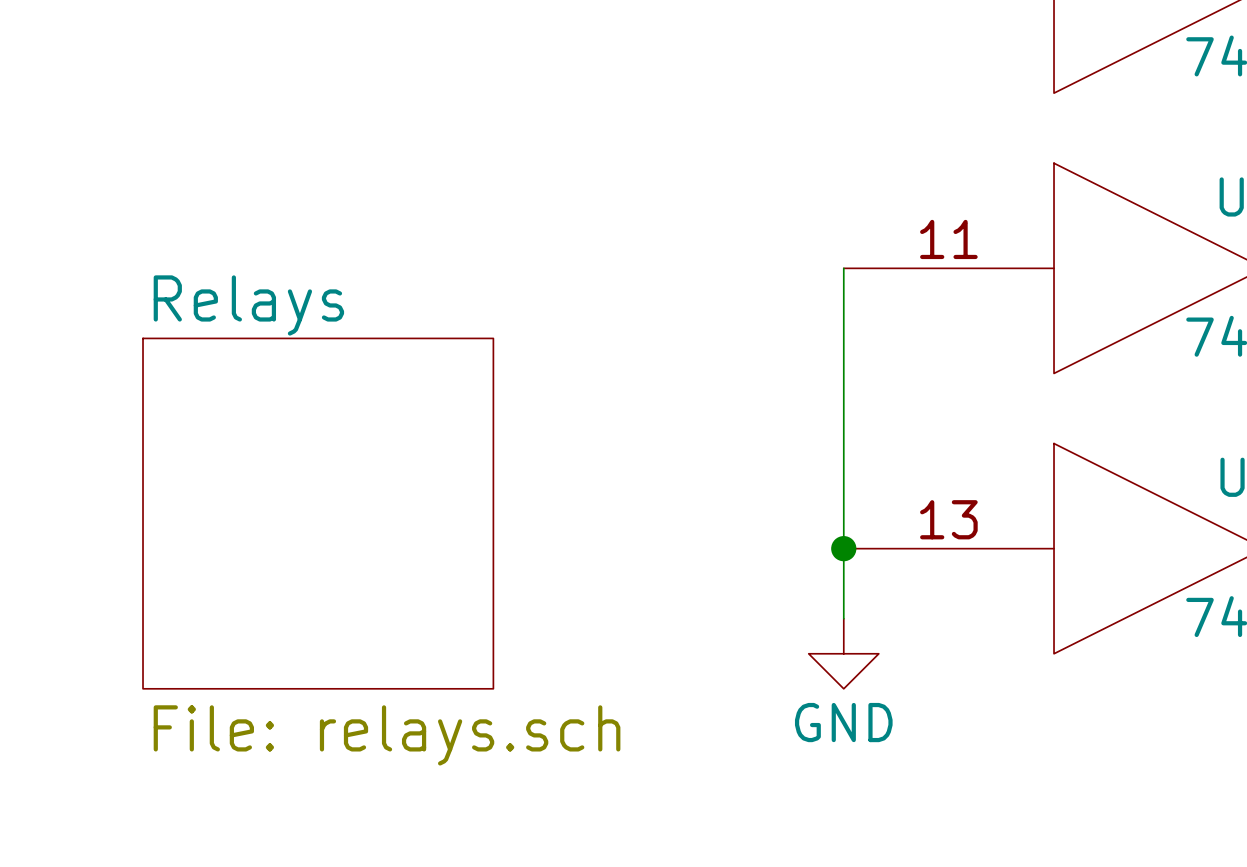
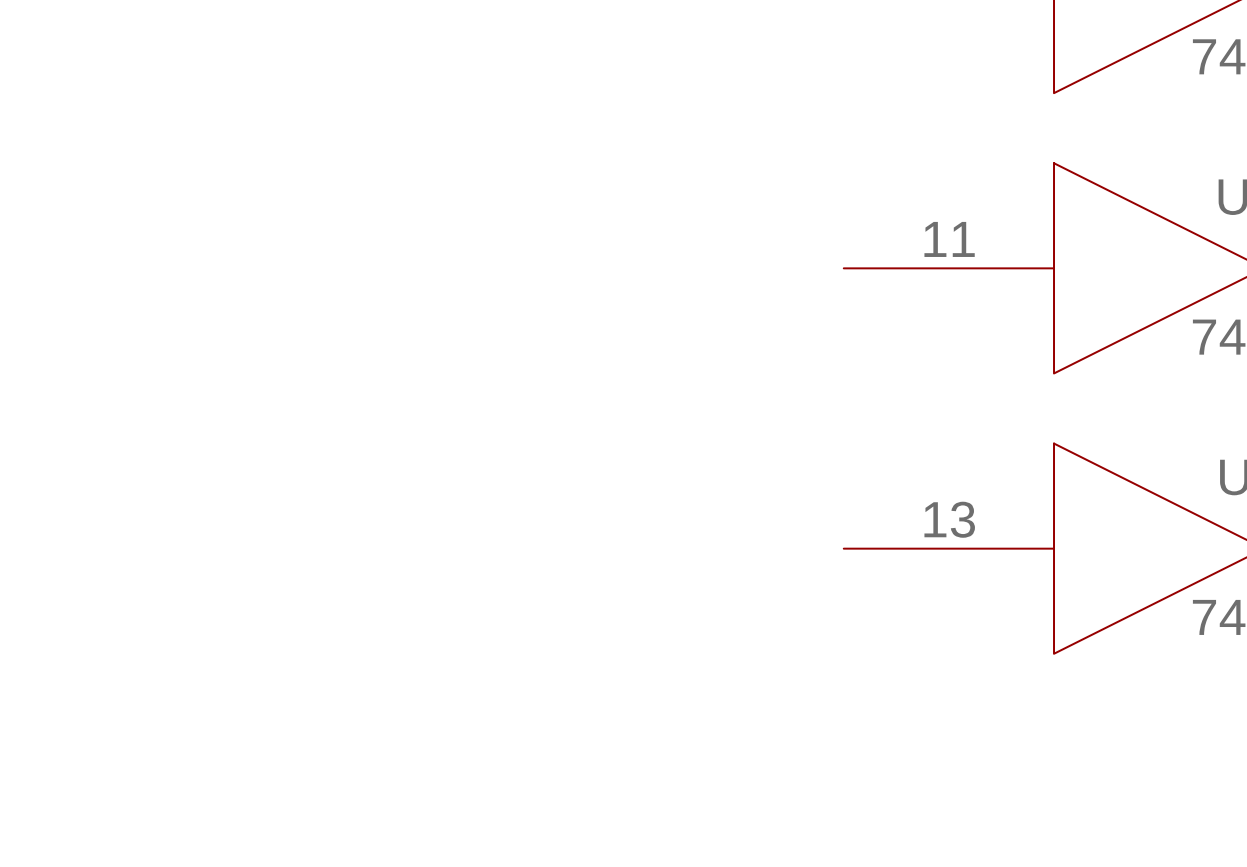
wire: (843, 268) (843, 618) -> none
sheet Relays: File: relays.sch (318, 513) -> none
junction: (843, 548) -> none
power symbol: GND (843, 653) -> none

